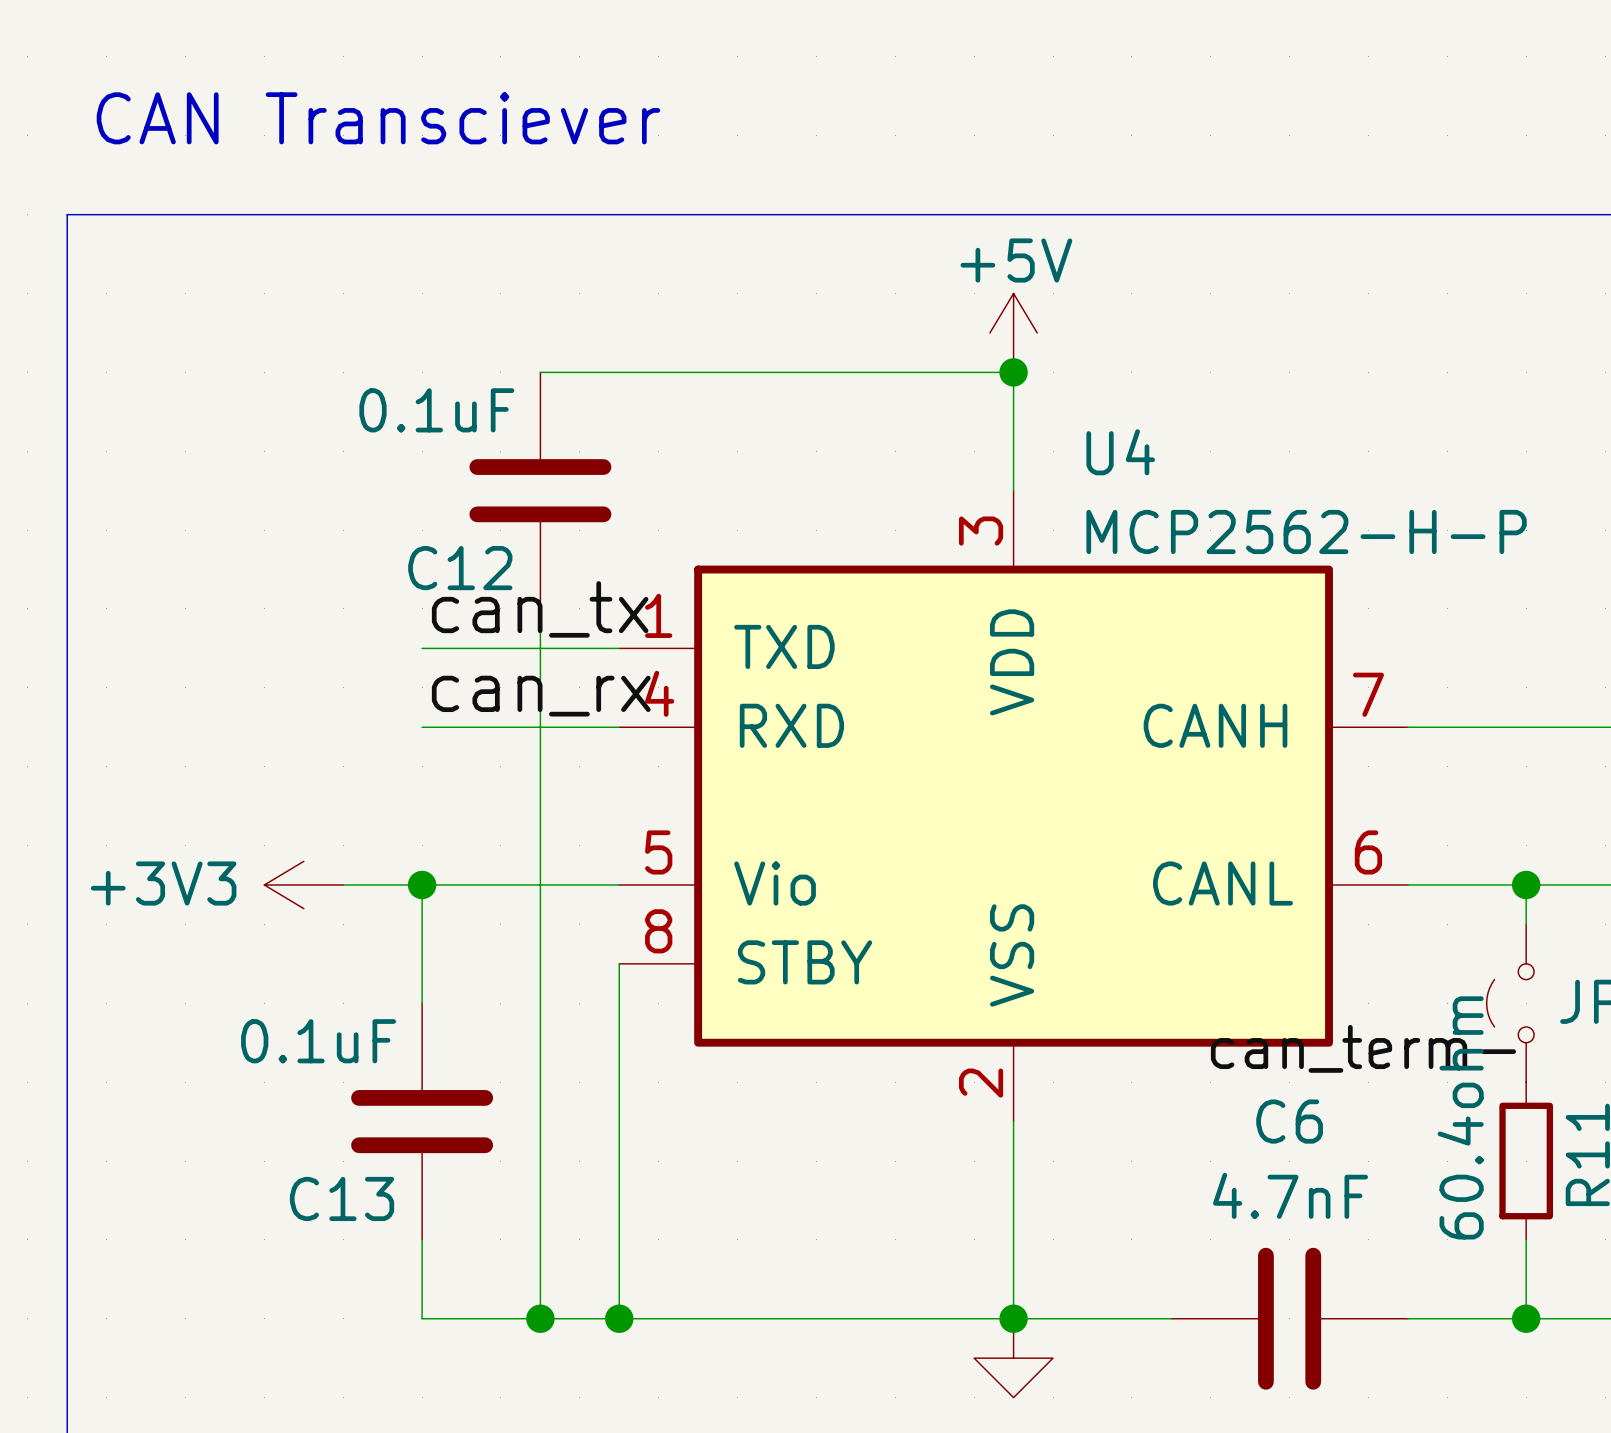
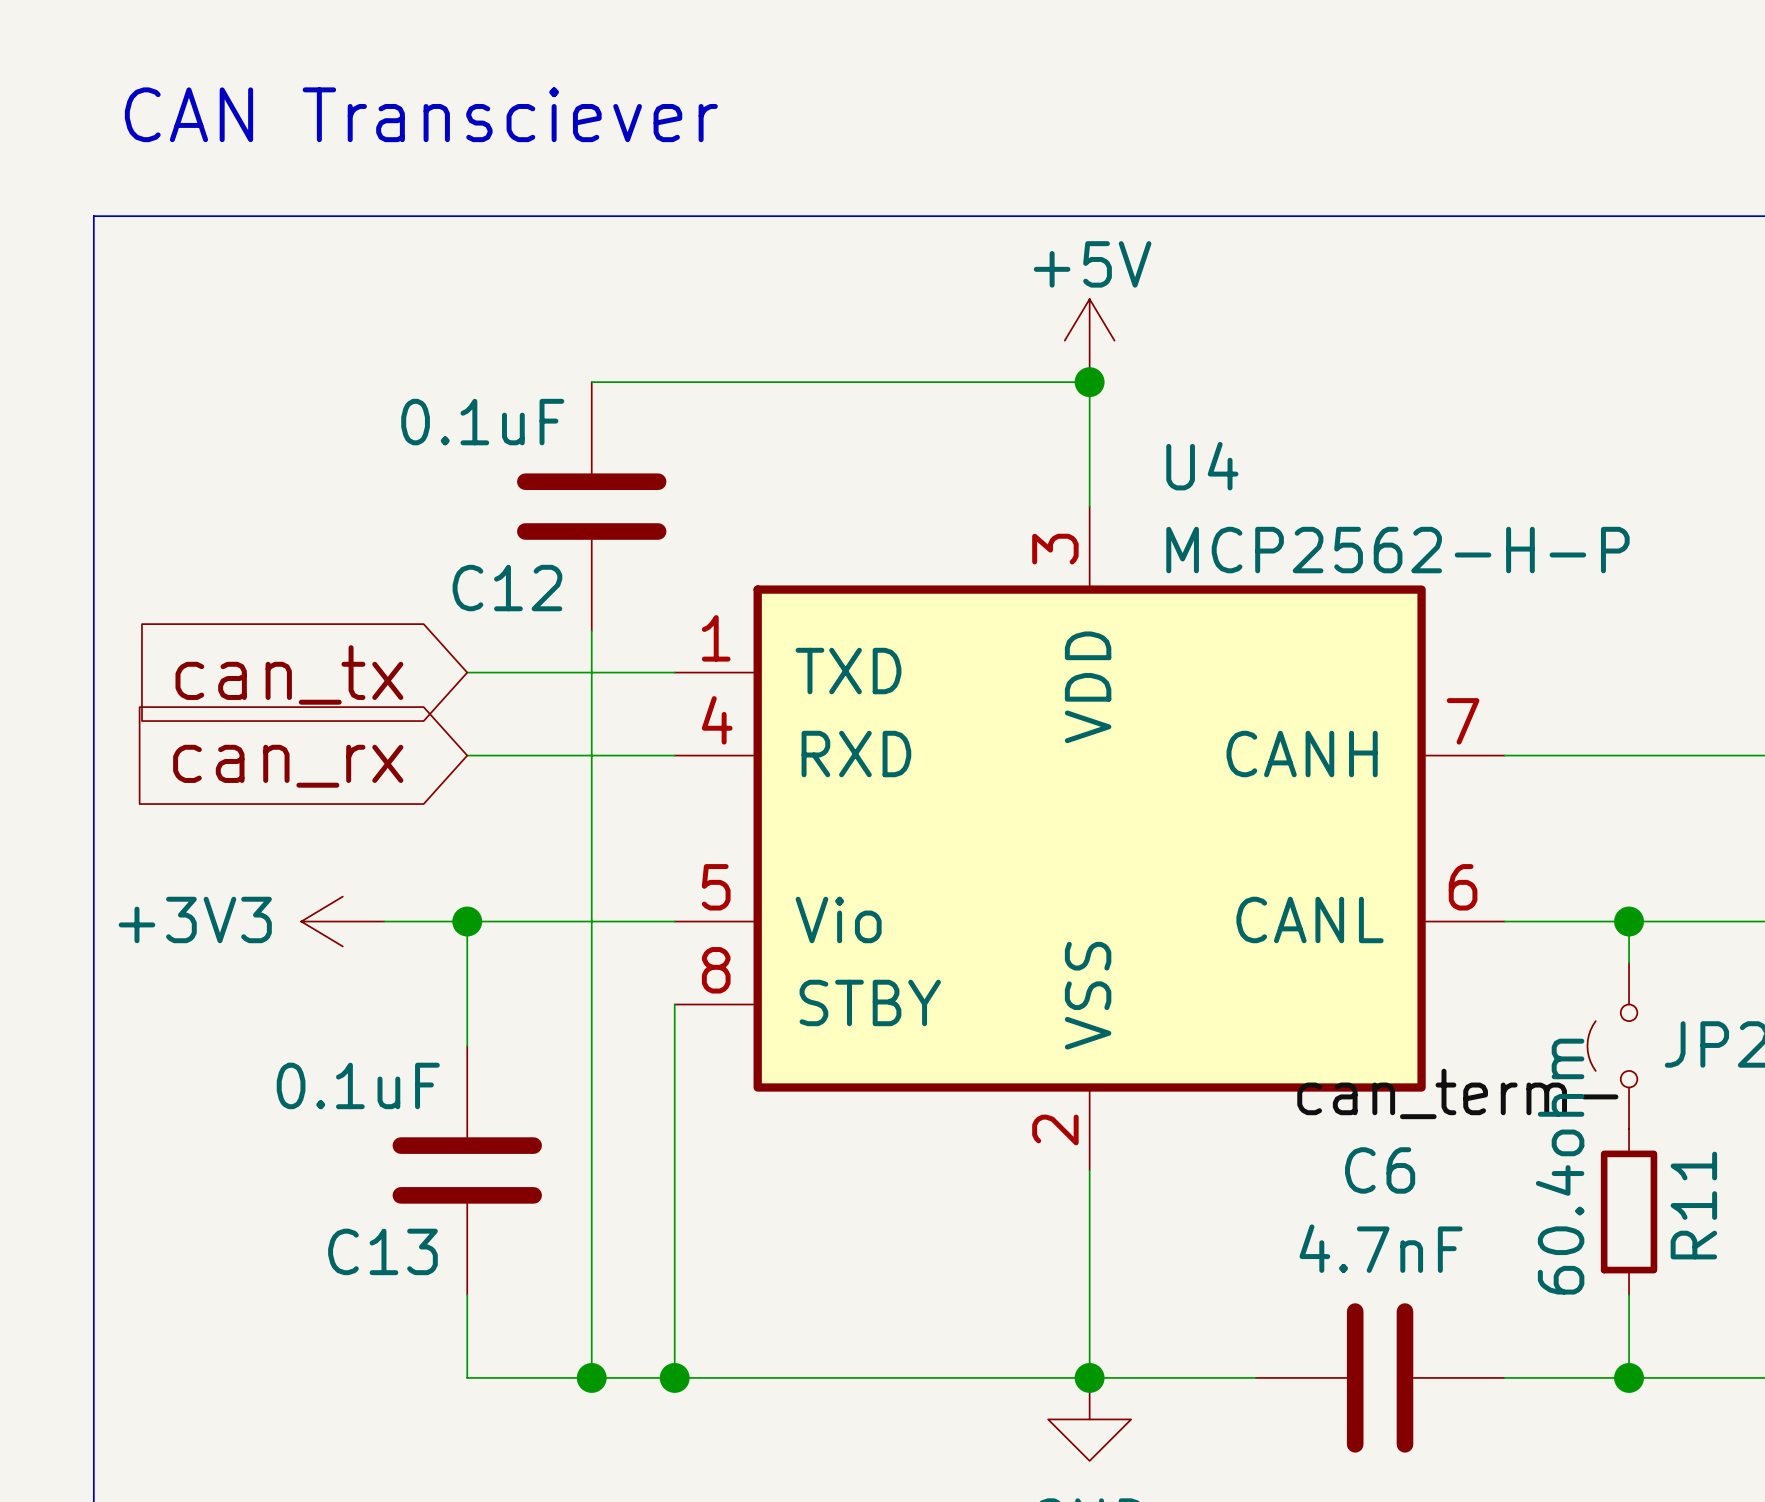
label: can_tx (540, 609) -> none
global label: none -> can_tx (289, 674)
label: can_rx (541, 696) -> none
global label: none -> can_rx (288, 766)

